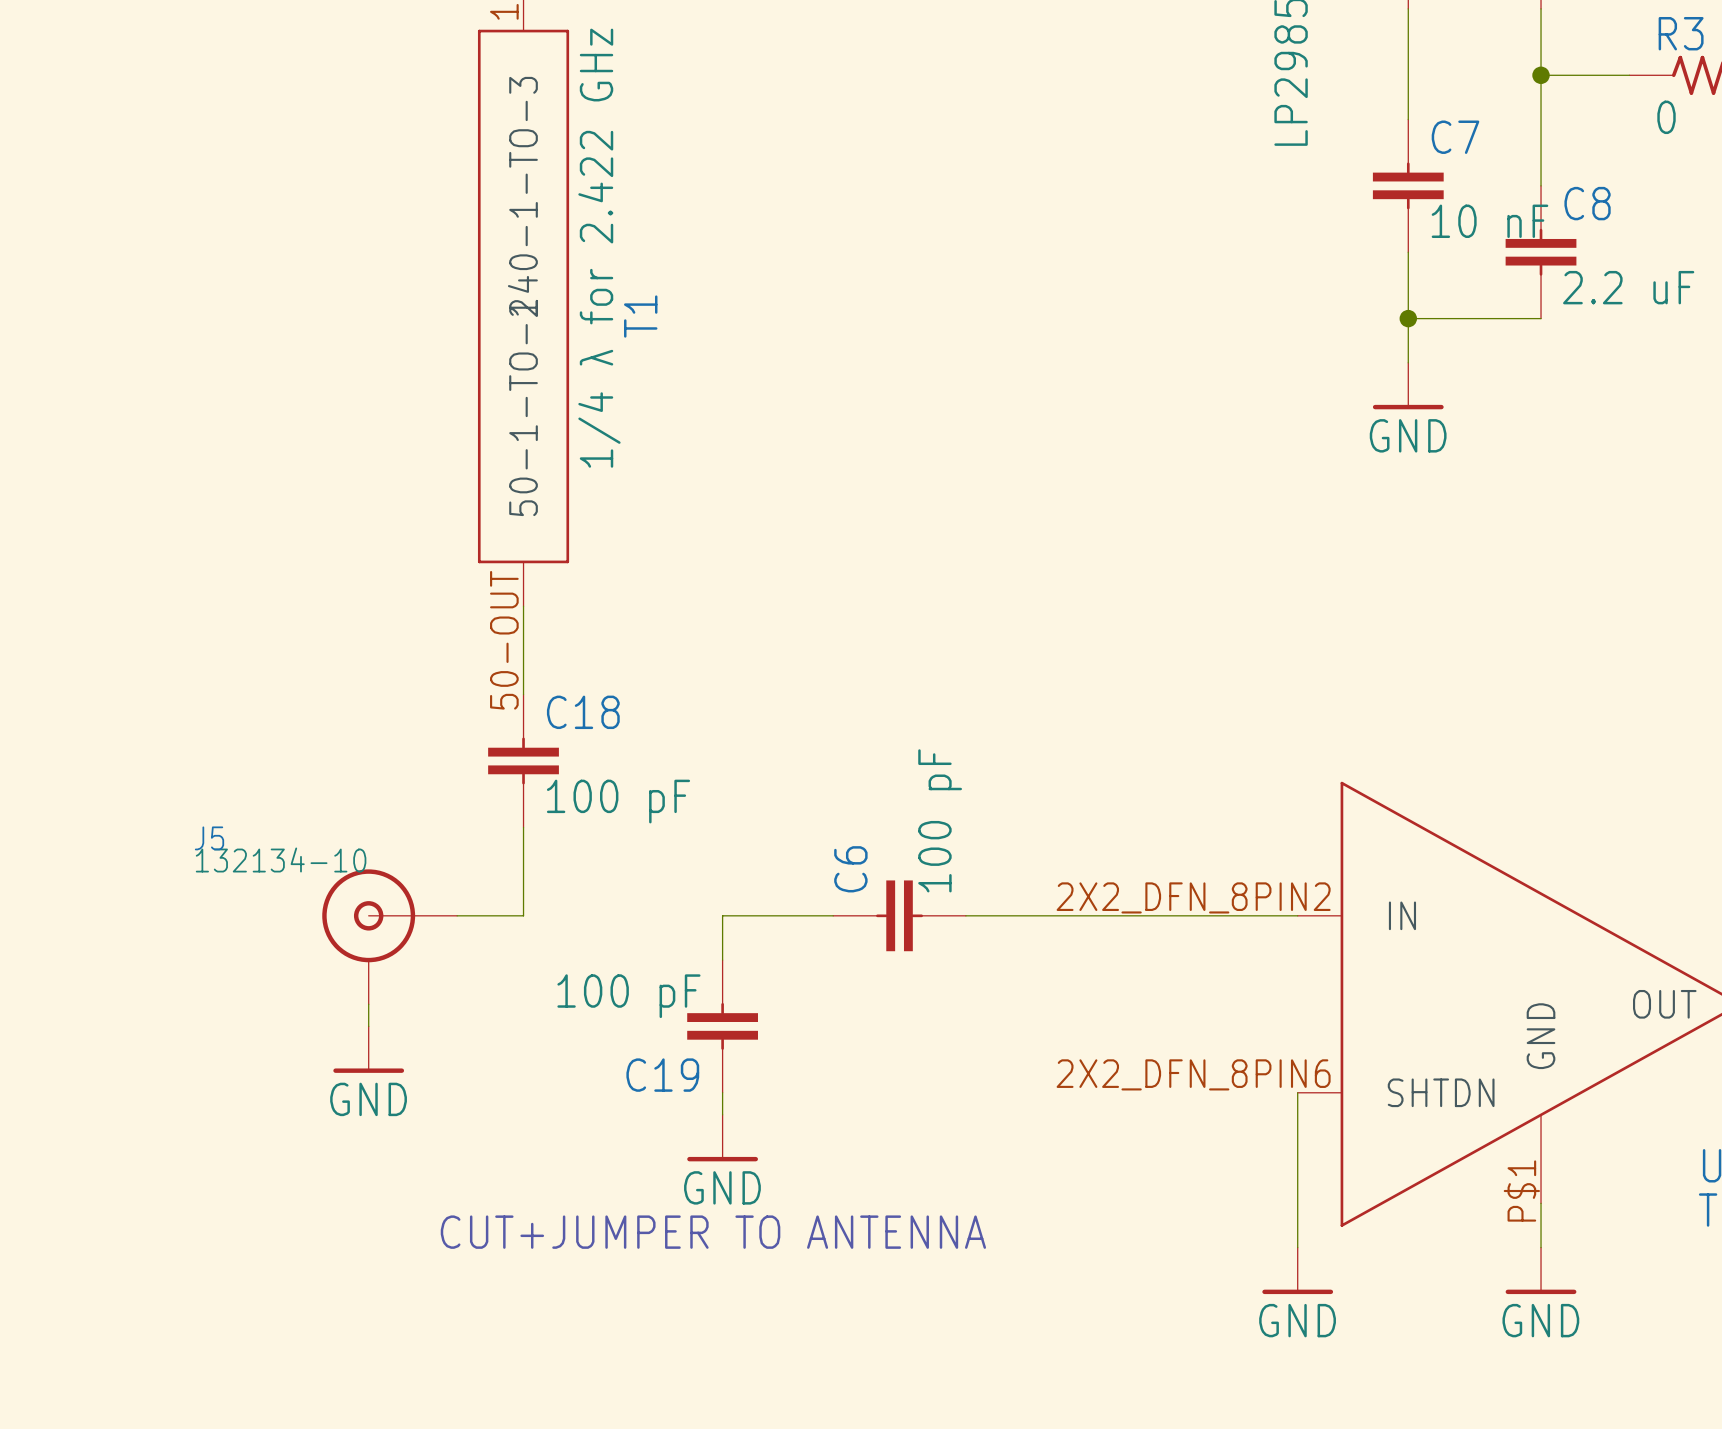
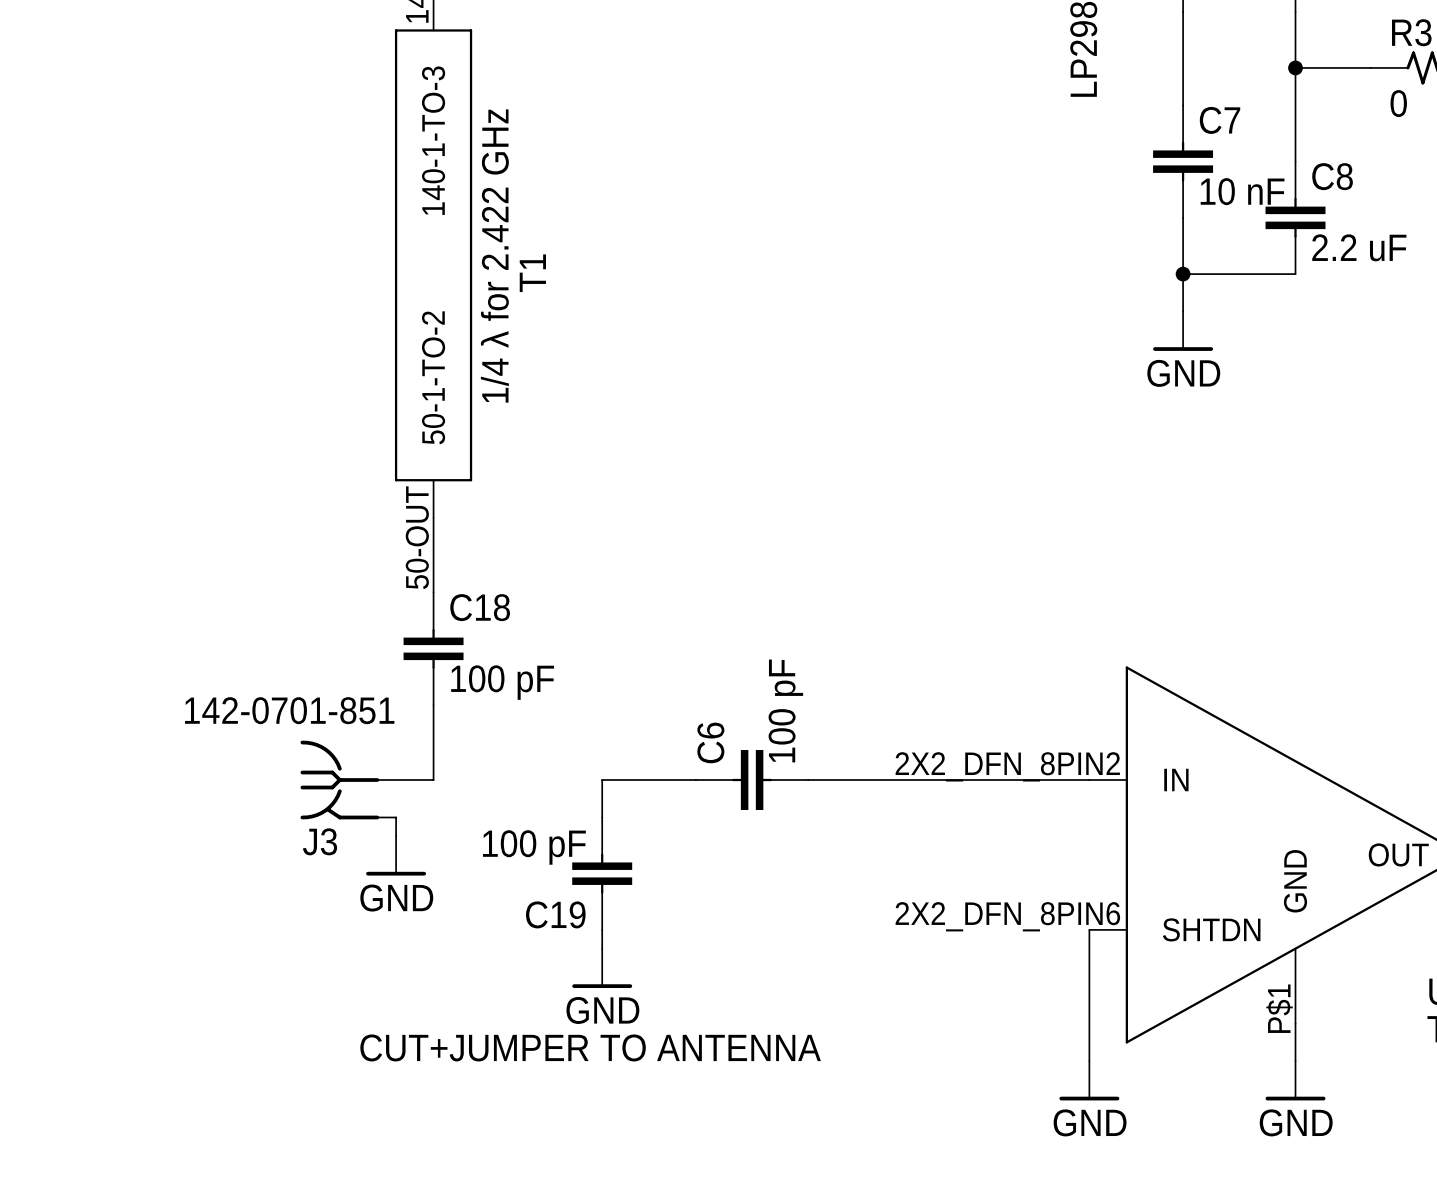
J3: none -> 142-0701-851 (339, 780)
J5: 132134-10 (389, 936) -> none
wire: none -> (377, 817) (396, 817) (396, 836)
wire: (368, 1004) (368, 1026) -> none
power symbol position: GND (368, 1049) -> GND (396, 855)

